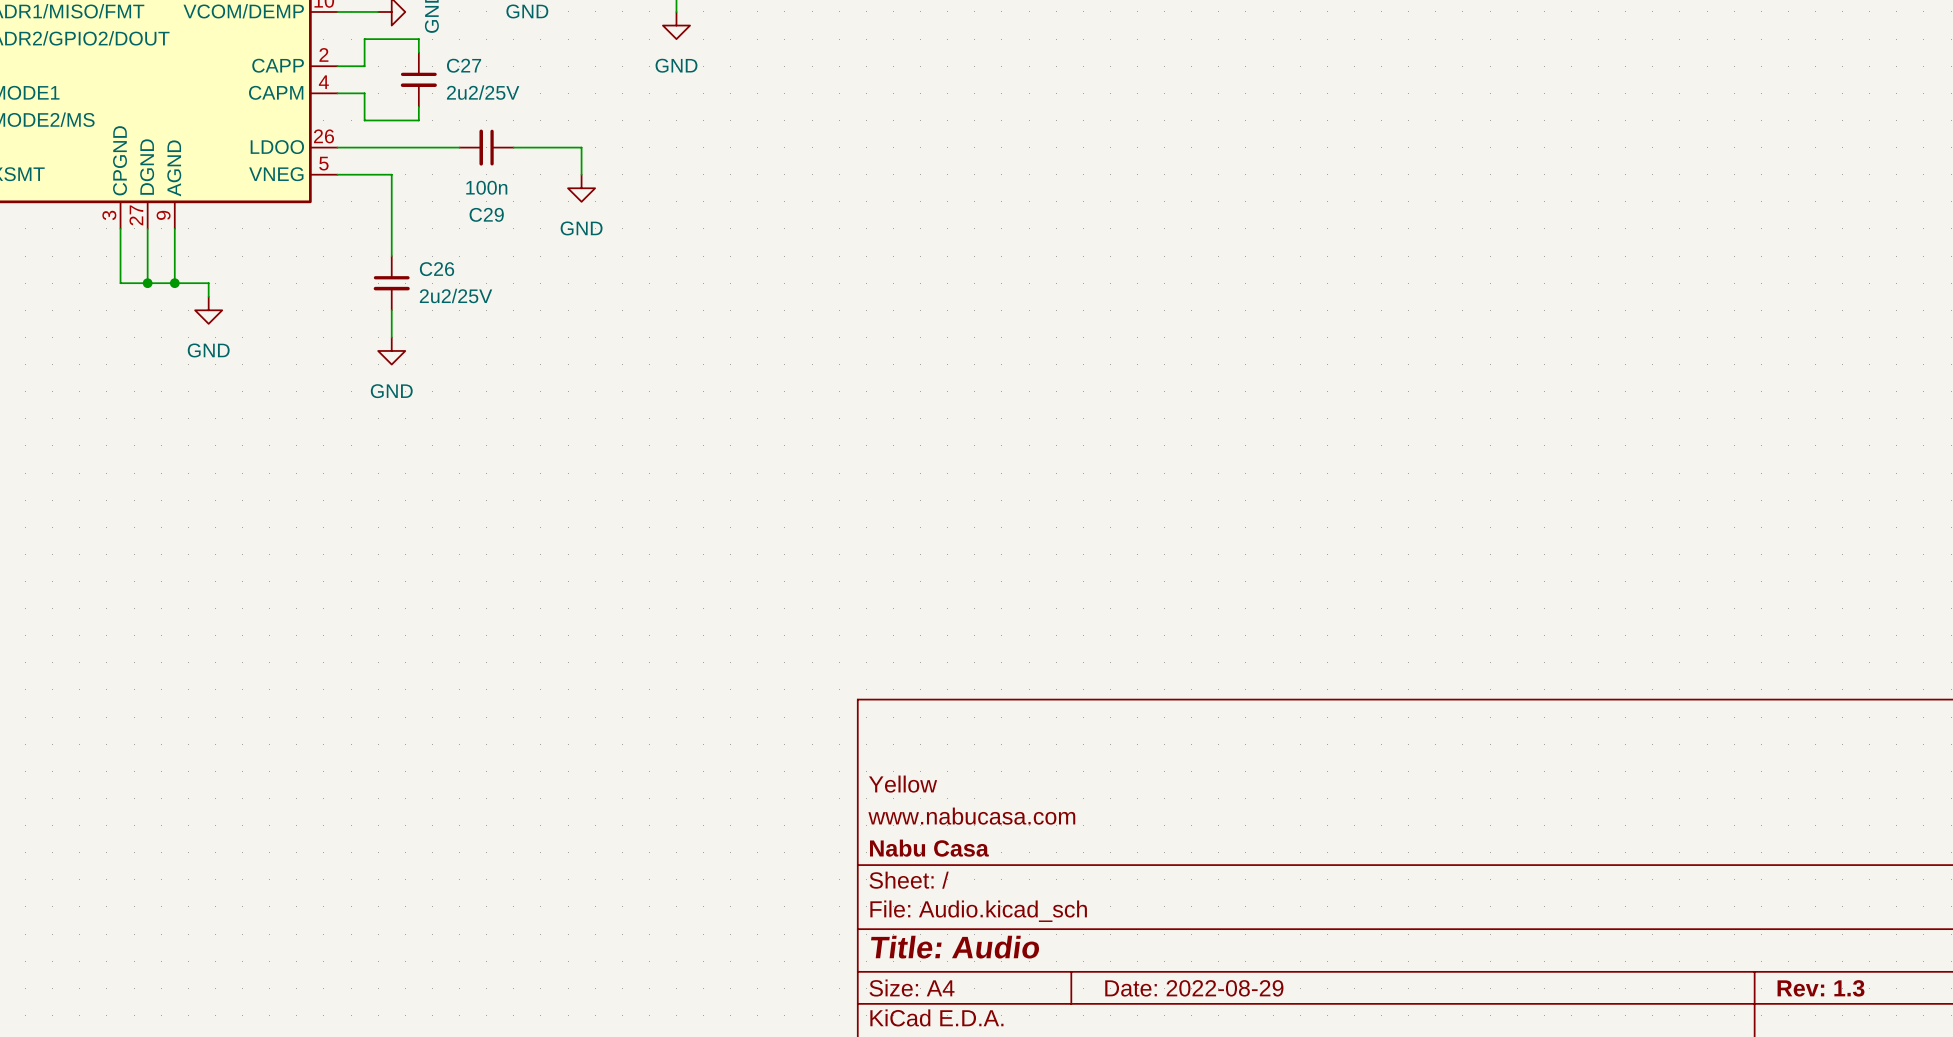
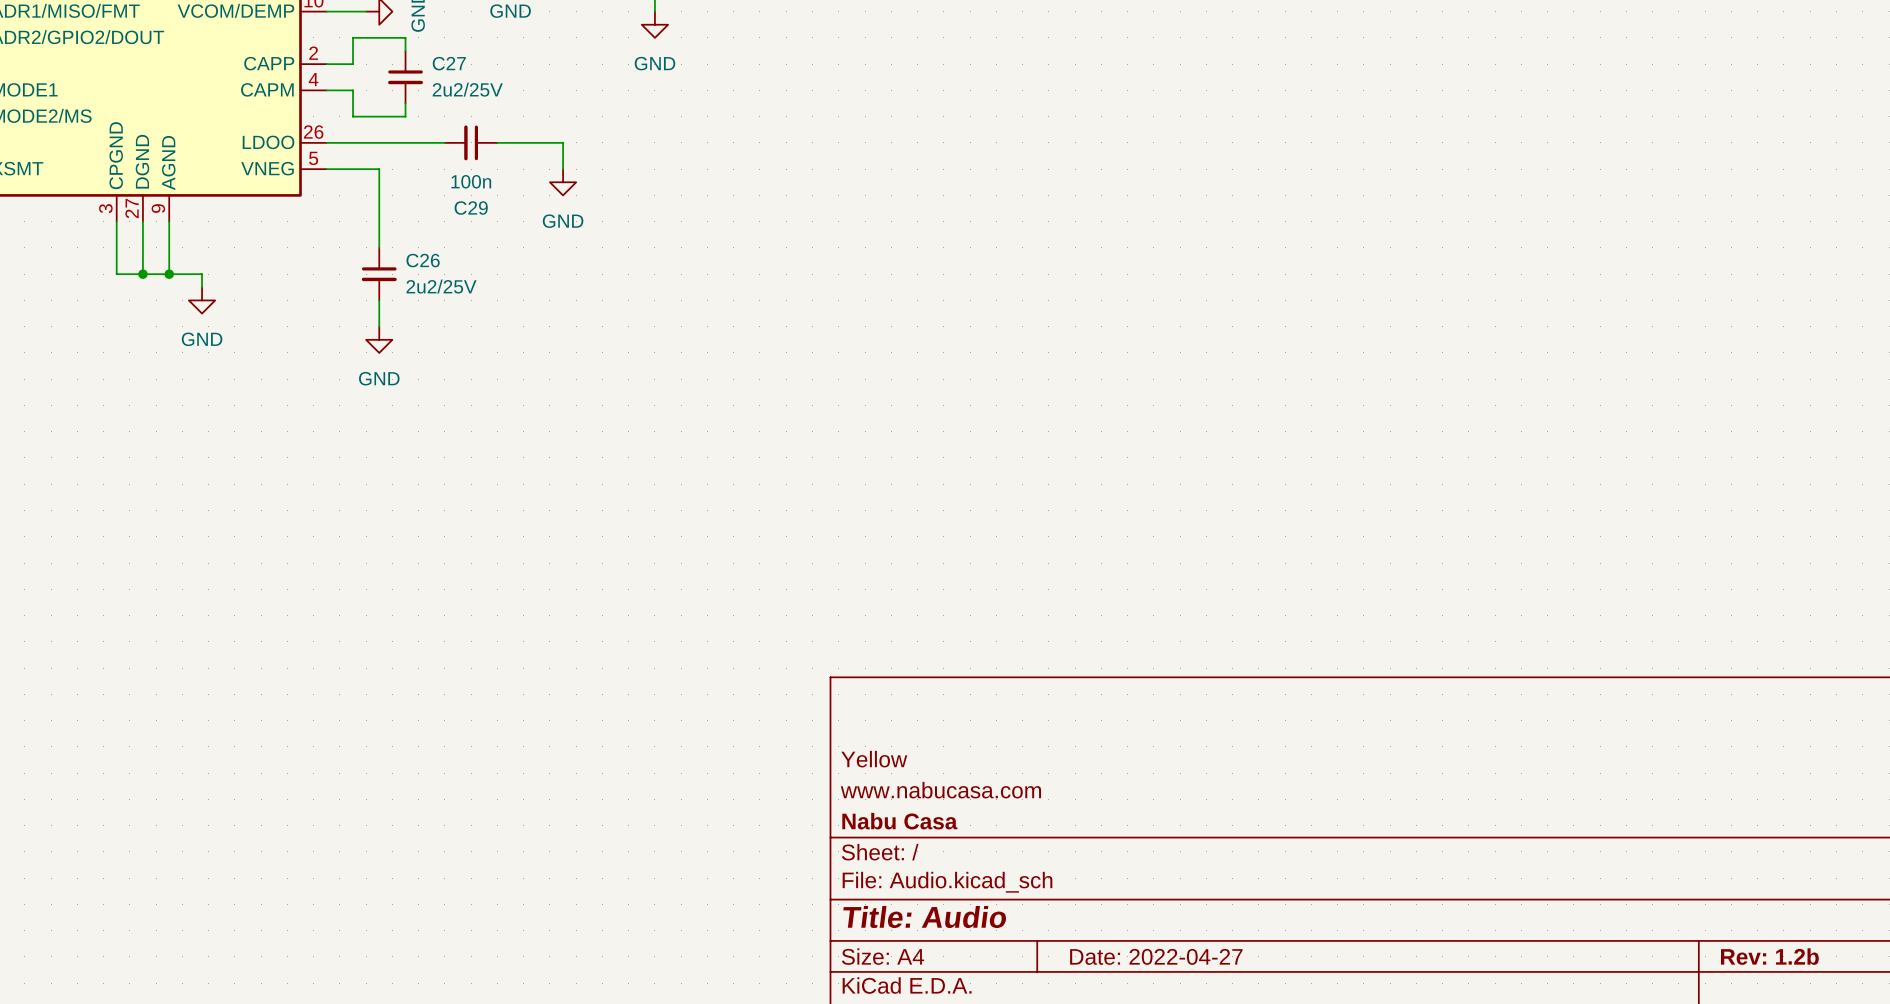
title block: Date: 2022-08-29 (1194, 988) -> Date: 2022-04-27 (1156, 956)
title block: Rev: 1.3 (1821, 988) -> Rev: 1.2b (1769, 956)

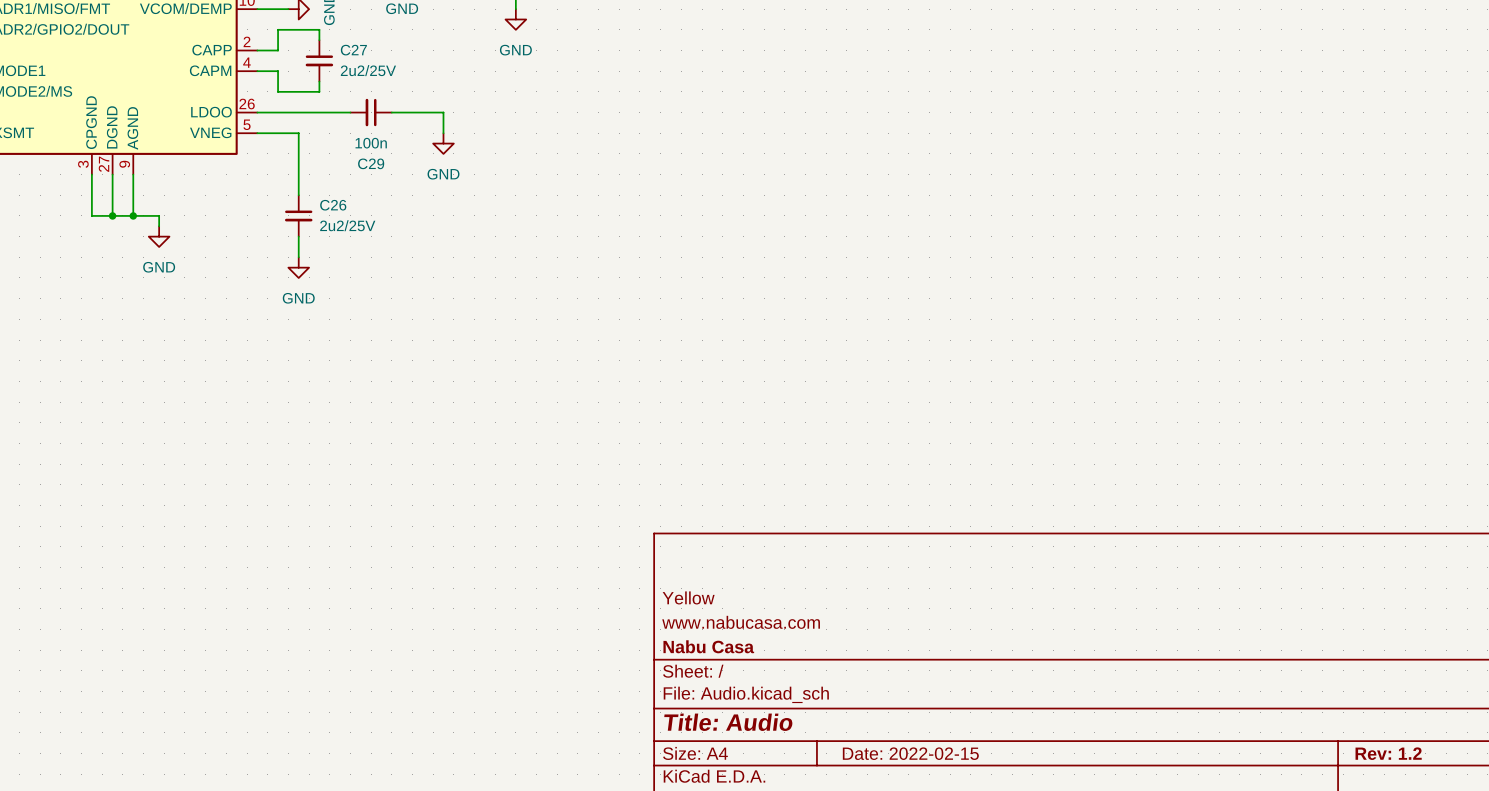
title block: Date: 2022-04-27 (1156, 956) -> Date: 2022-02-15 (910, 753)
title block: Rev: 1.2b (1769, 956) -> Rev: 1.2 (1388, 753)

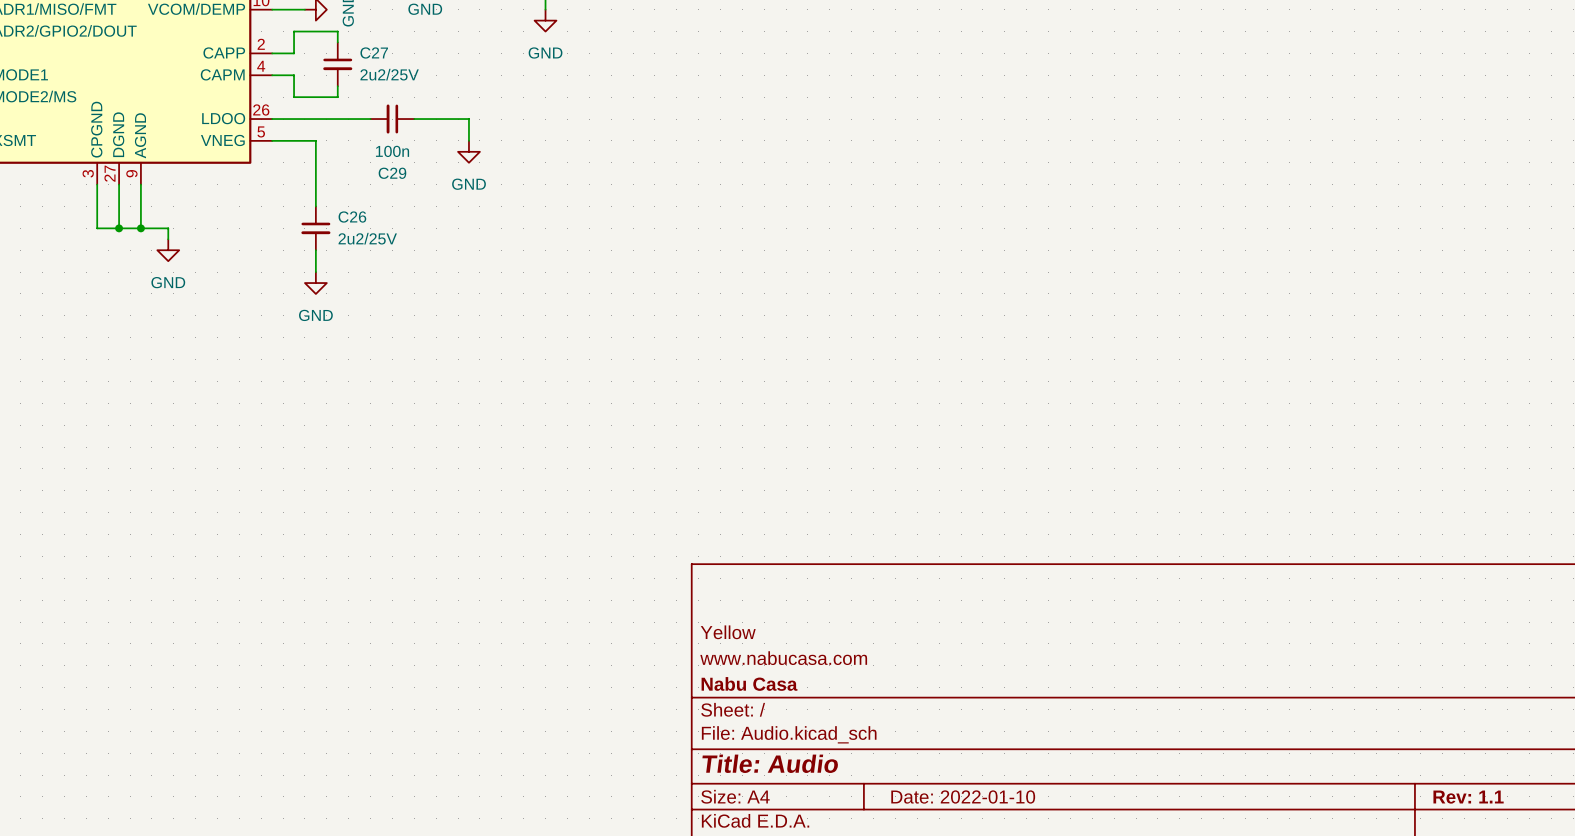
title block: Date: 2022-02-15 (910, 753) -> Date: 2022-01-10 (963, 797)
title block: Rev: 1.2 (1388, 753) -> Rev: 1.1 (1468, 797)

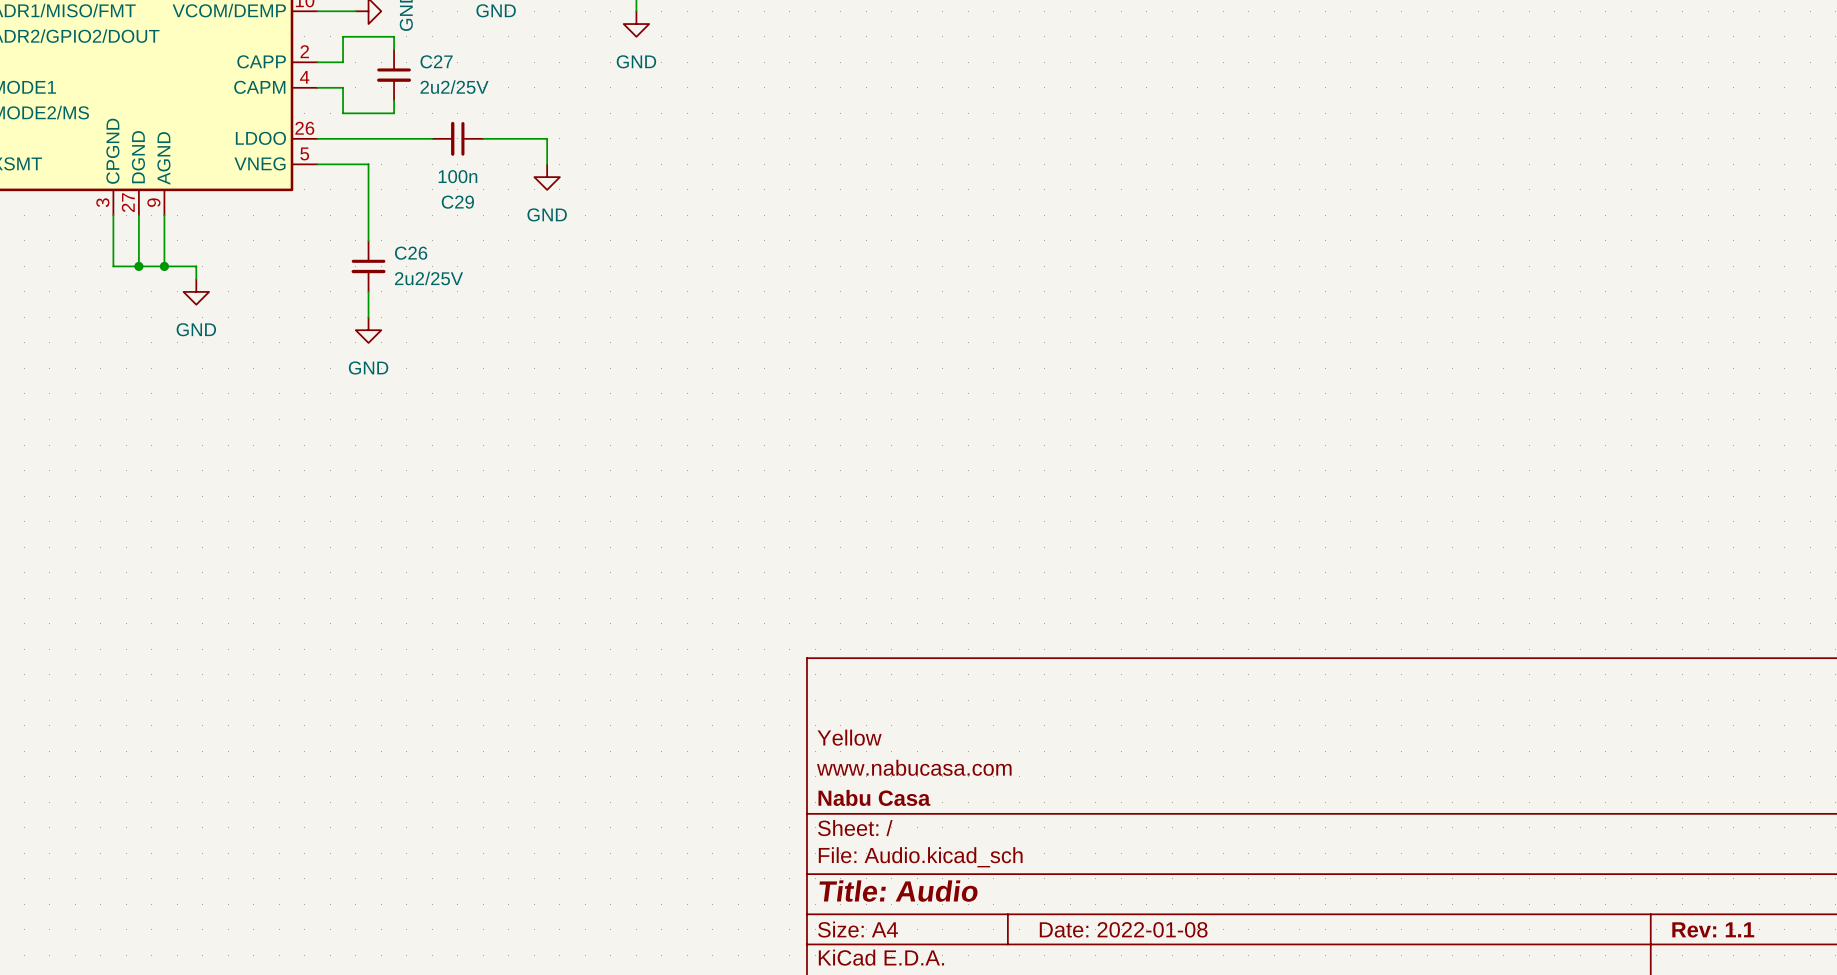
title block: Date: 2022-01-10 (963, 797) -> Date: 2022-01-08 (1123, 929)

